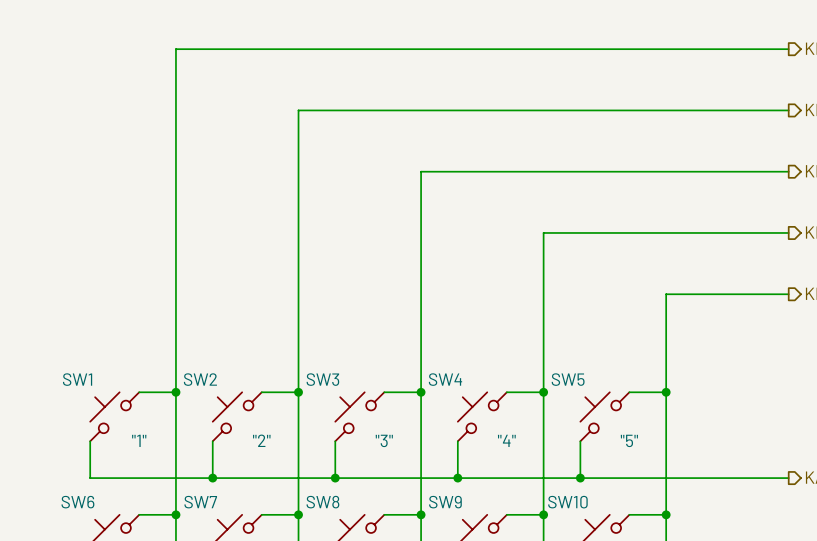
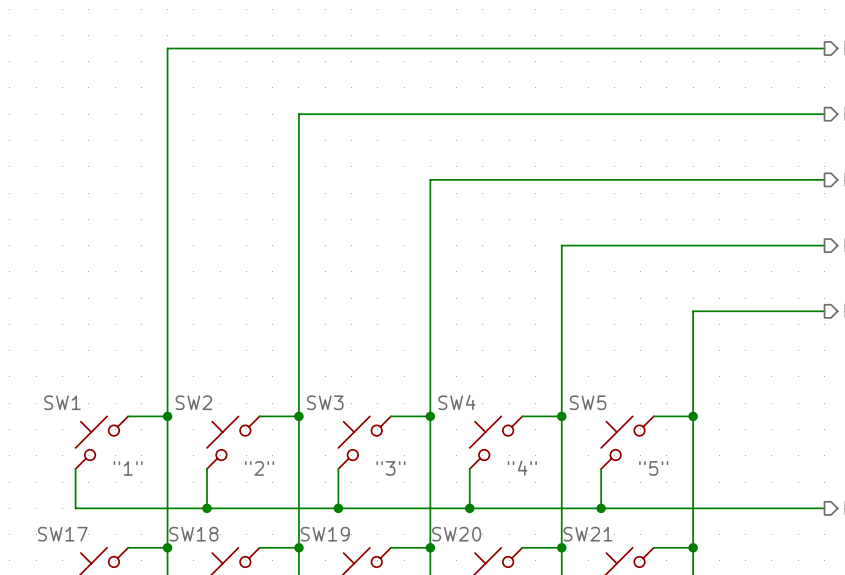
SW6 name: SW6 (77, 502) -> SW17 (62, 534)
SW7 name: SW7 (200, 502) -> SW18 (193, 534)
SW8 name: SW8 (322, 502) -> SW19 (325, 534)
SW9 name: SW9 (445, 502) -> SW20 (456, 534)
SW10 name: SW10 (567, 502) -> SW21 (588, 534)

